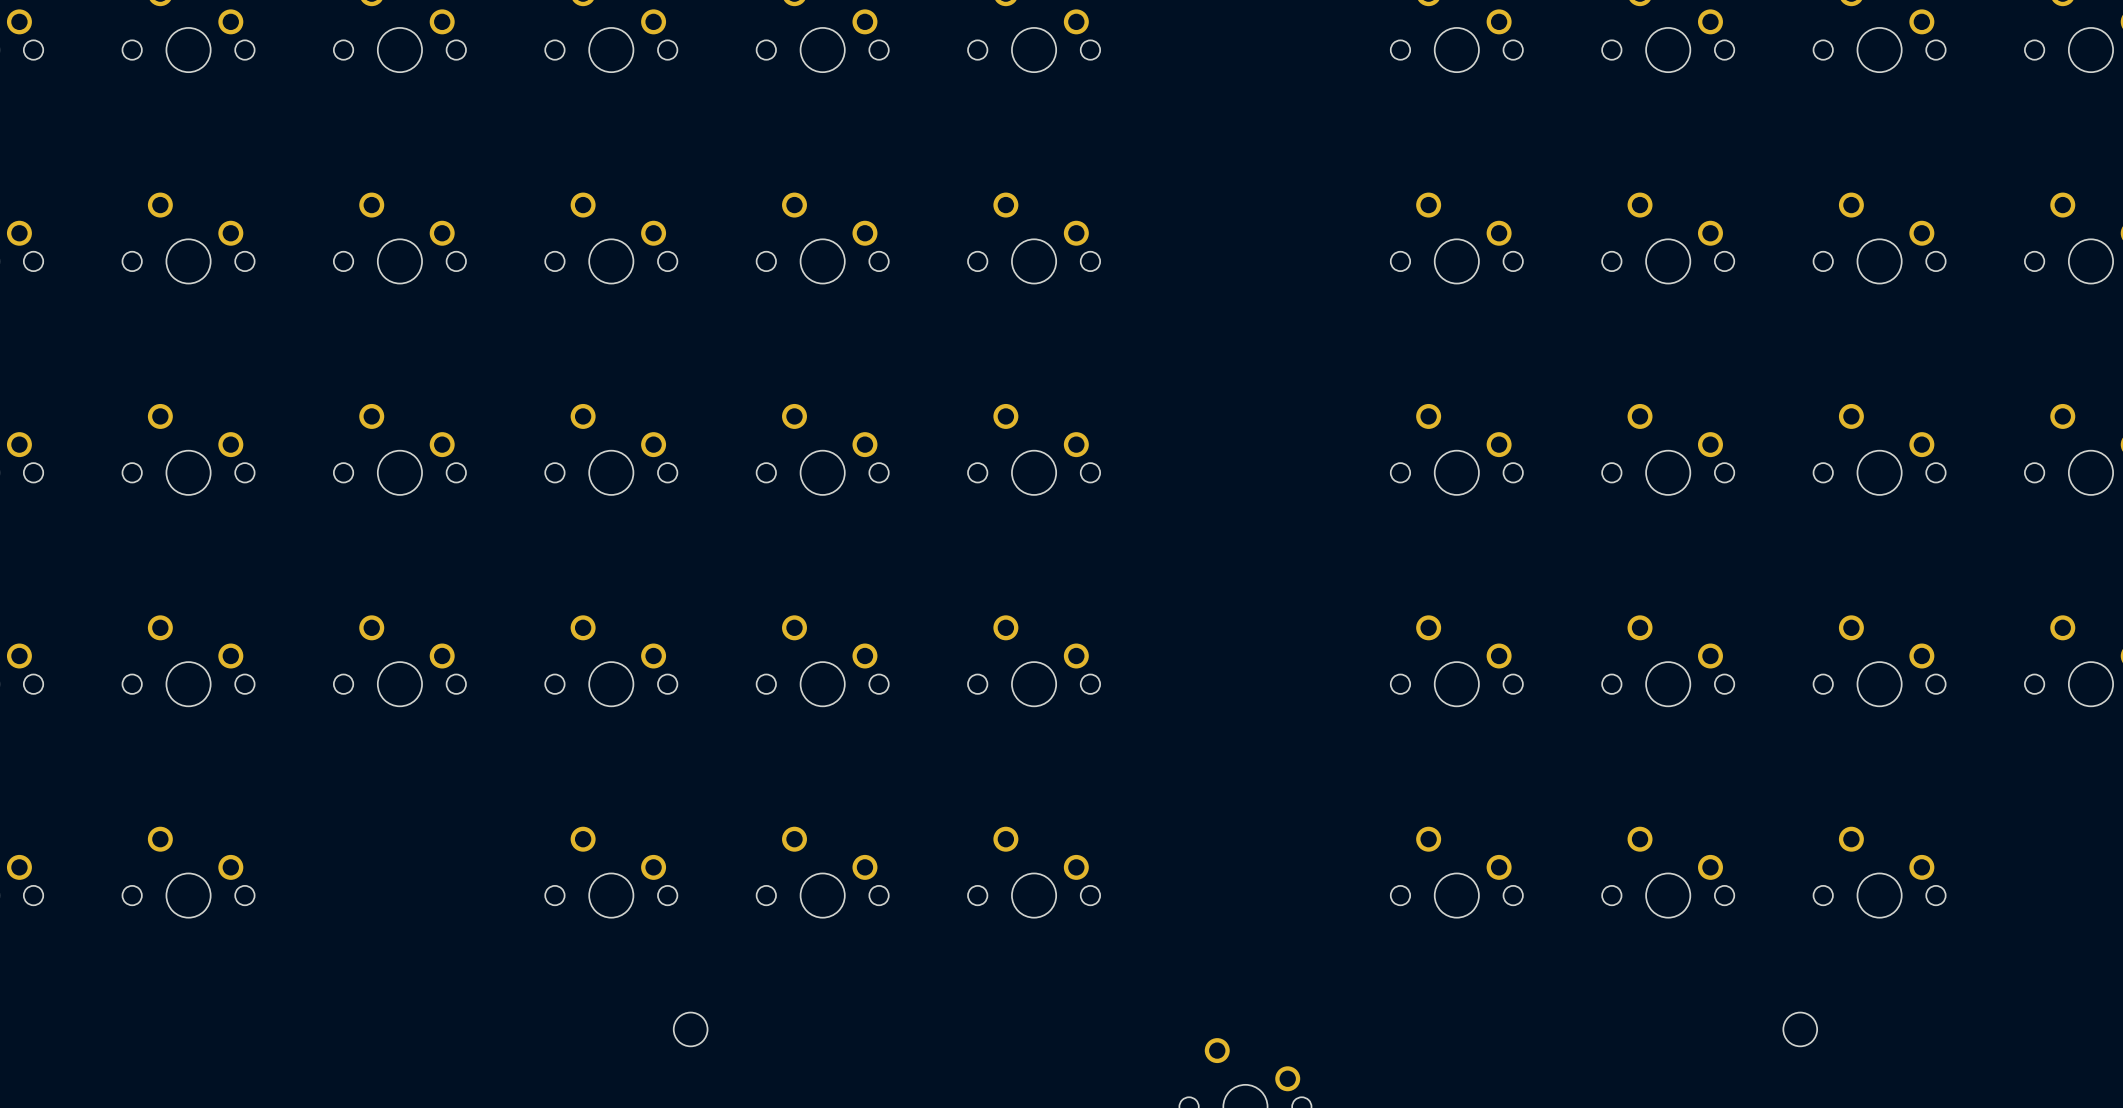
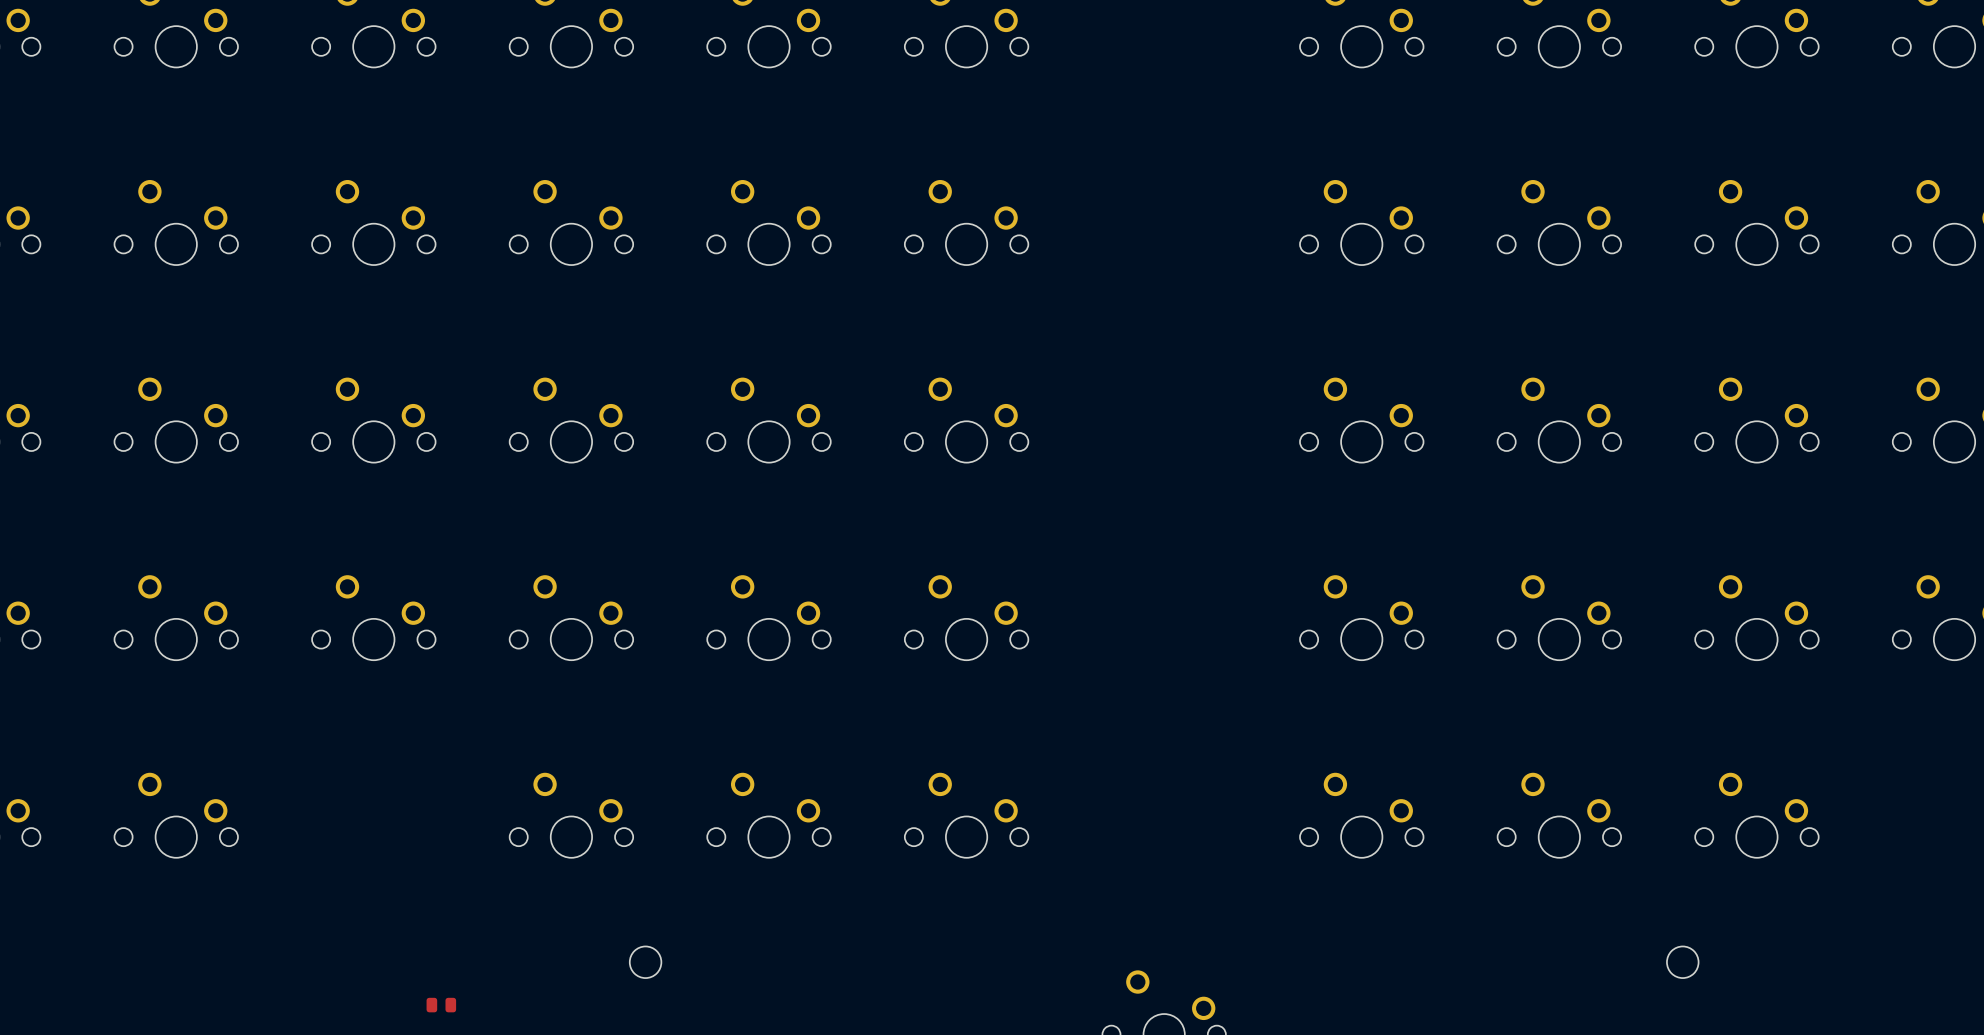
part: none -> (441, 1005)

